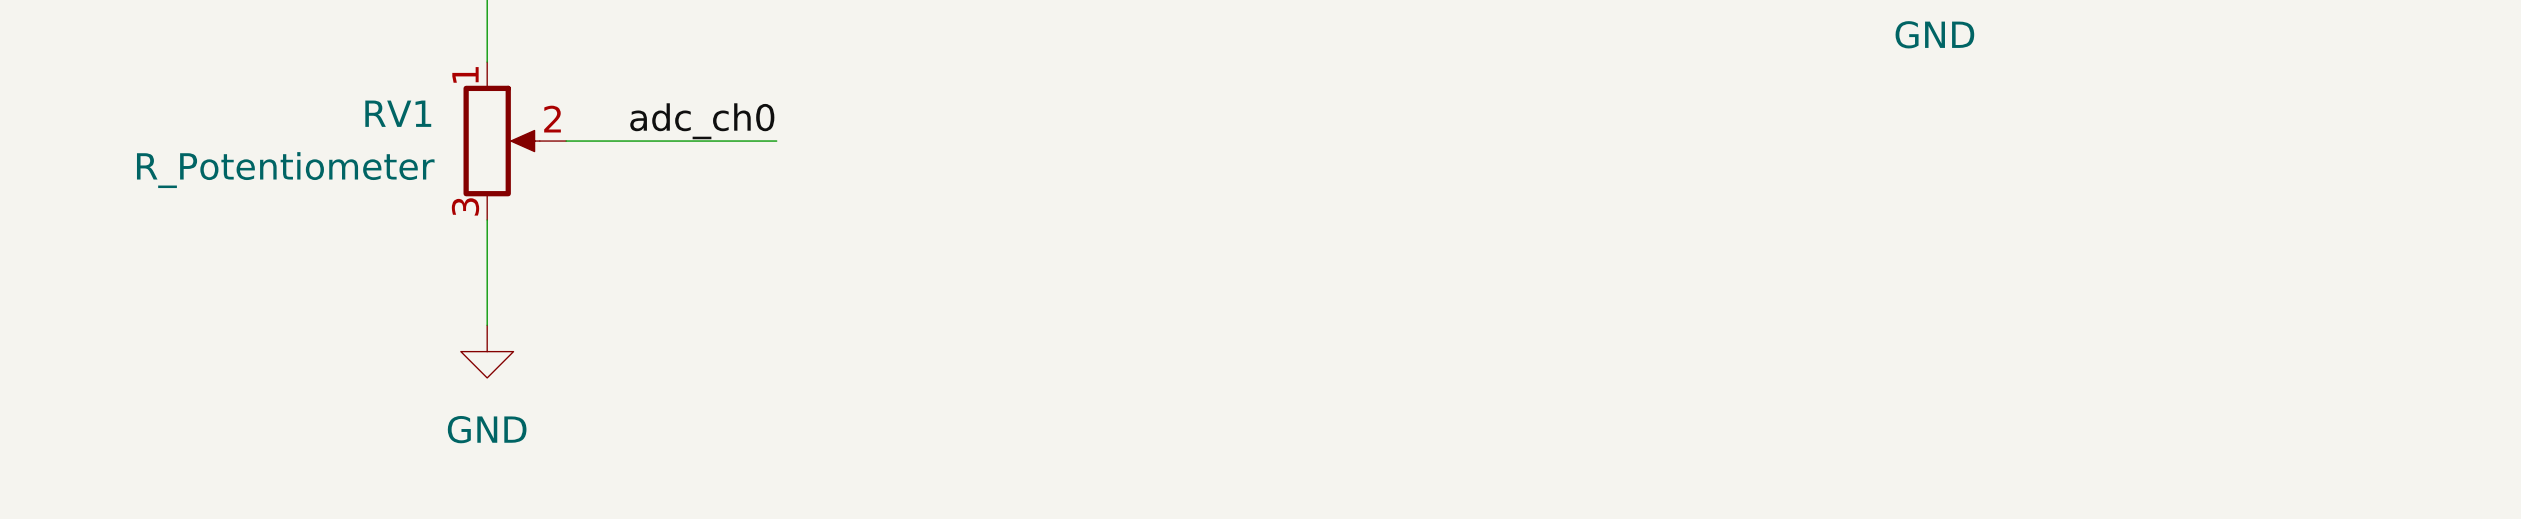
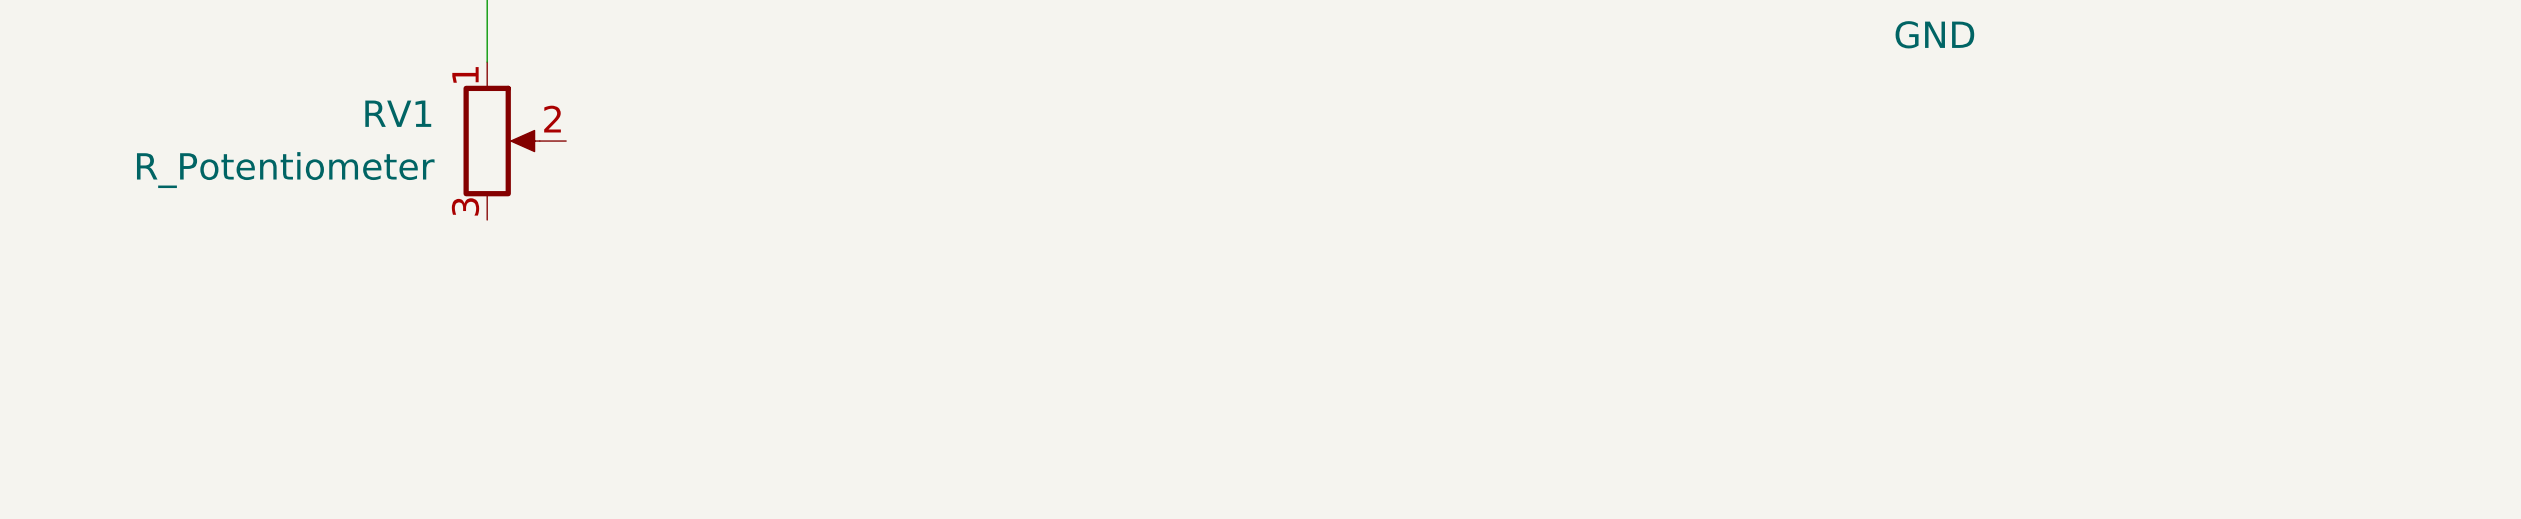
label: adc_ch0 (702, 121) -> none
wire: (566, 141) (776, 141) -> none
wire: (487, 220) (487, 325) -> none
power symbol: GND (487, 351) -> none

